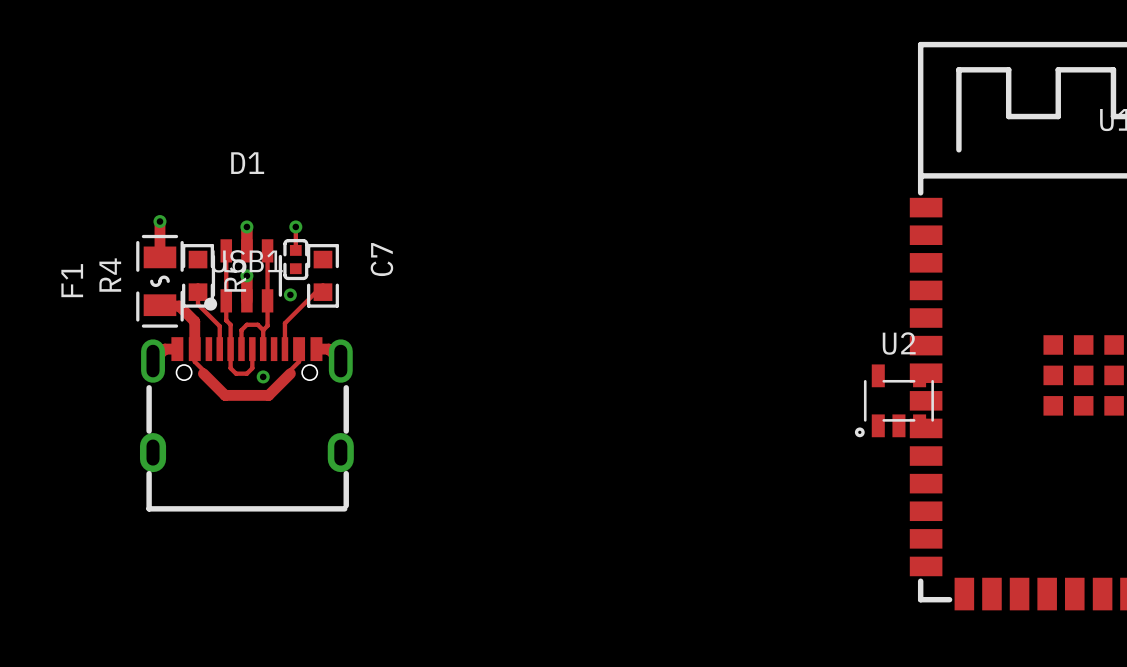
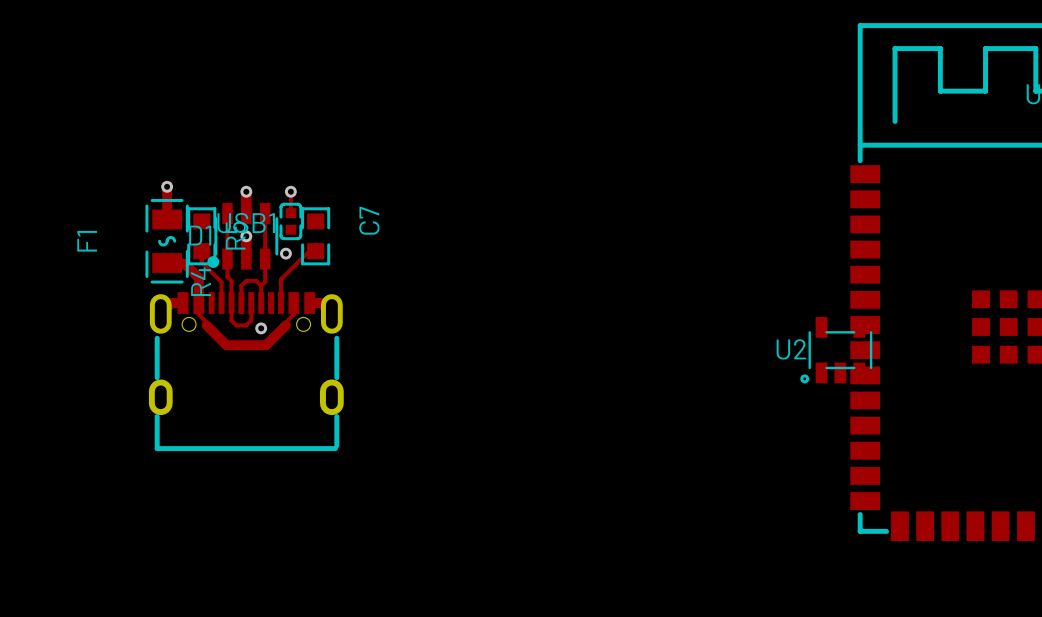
D1 name position: D1 (247, 163) -> D1 (200, 235)
R4 name position: R4 (110, 275) -> R4 (201, 281)
U2 name position: U2 (899, 343) -> U2 (791, 349)

